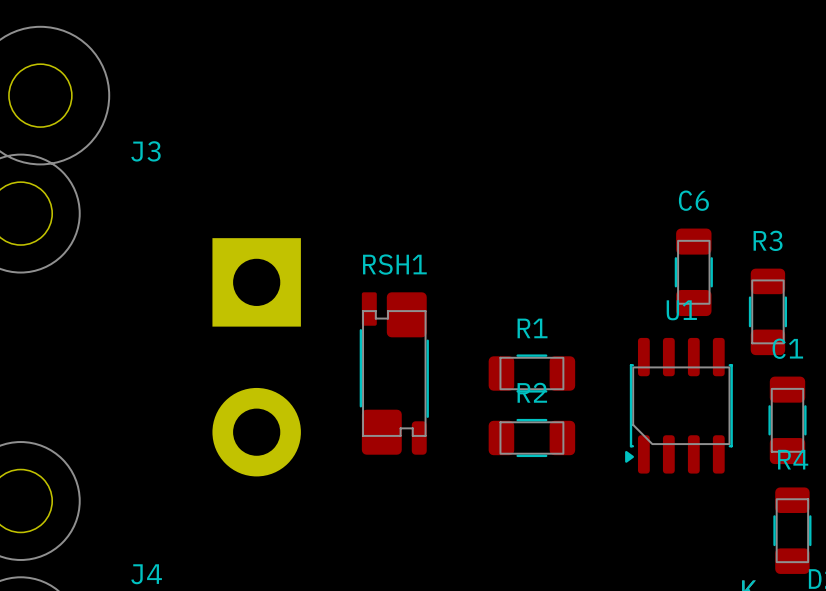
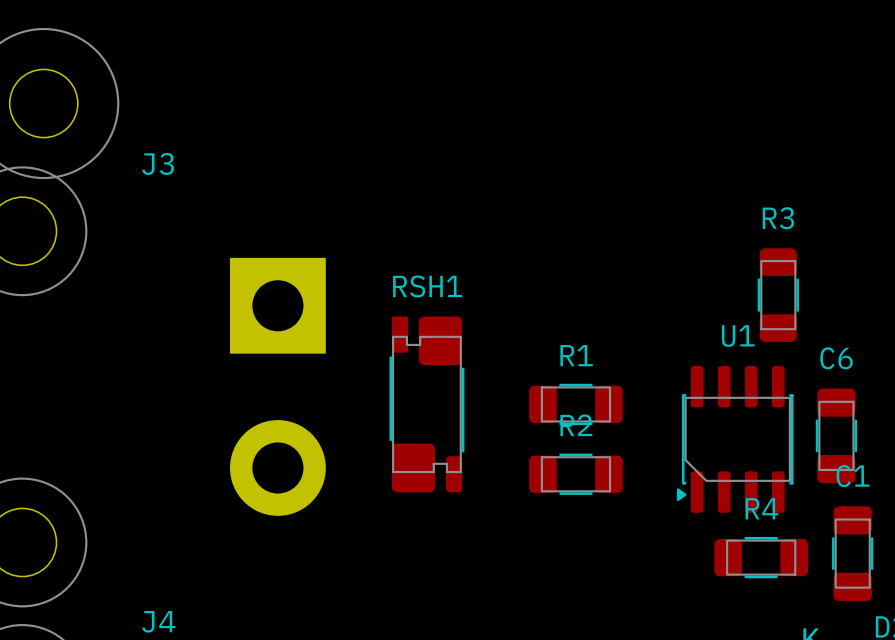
C6 position: (693, 272) -> (836, 435)
R3 position: (767, 311) -> (778, 295)
C1 position: (787, 420) -> (852, 553)
R4 rotation: 0° (792, 530) -> 90° clockwise (761, 557)
R4 position: (792, 530) -> (761, 557)

